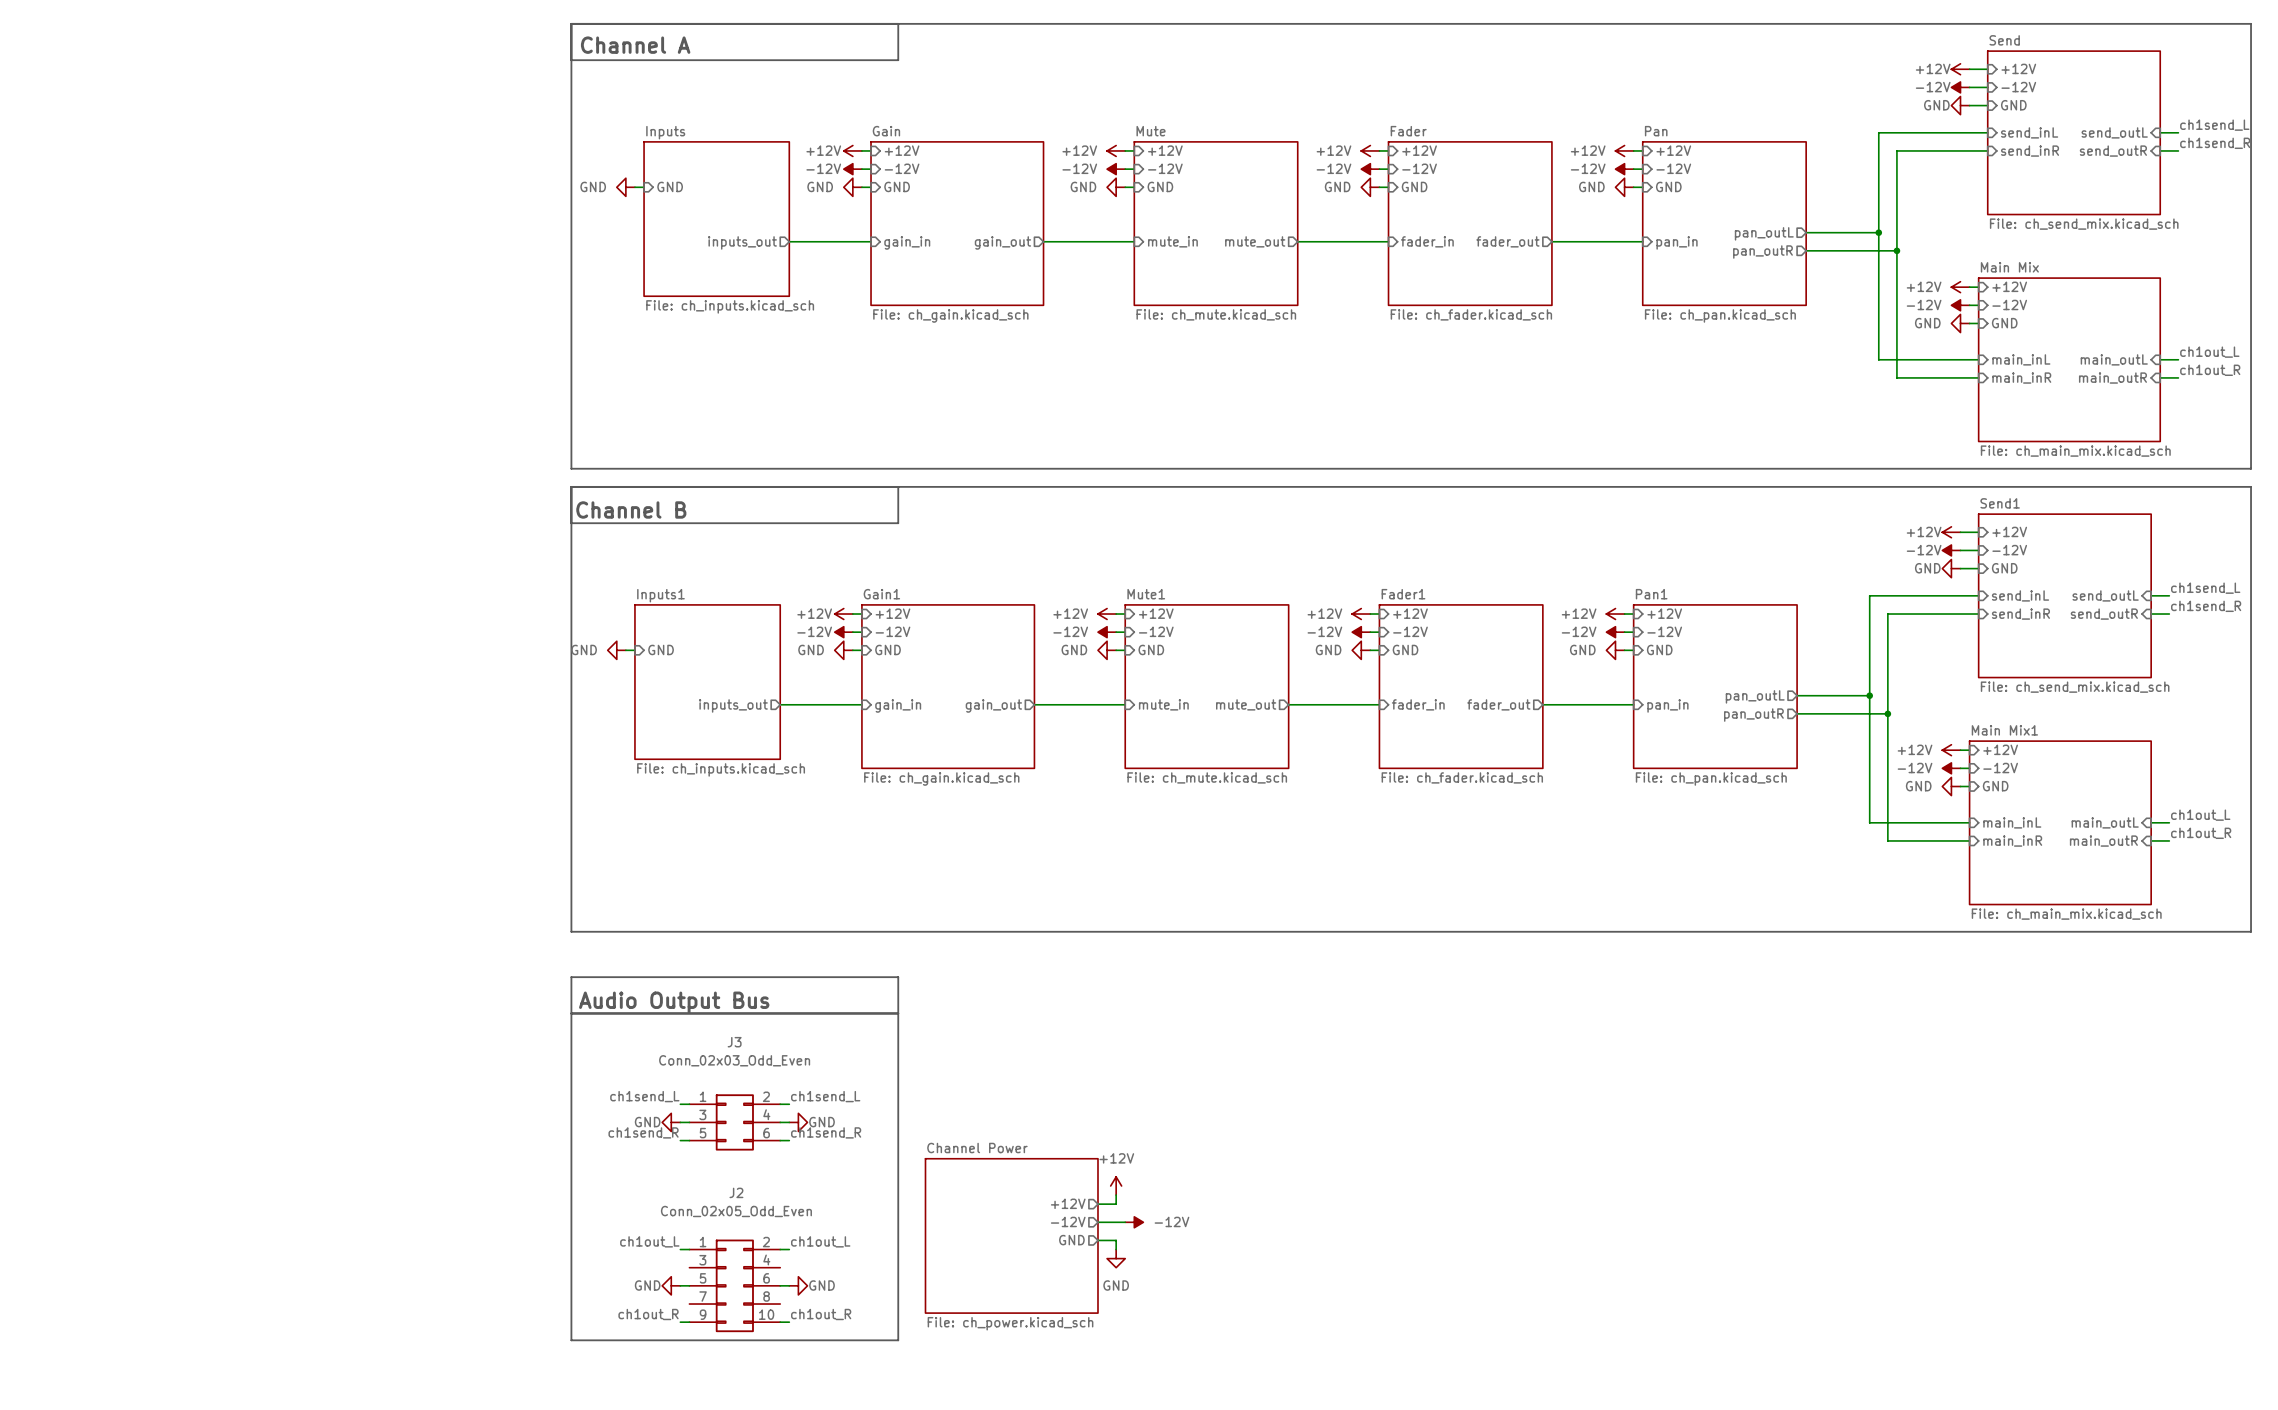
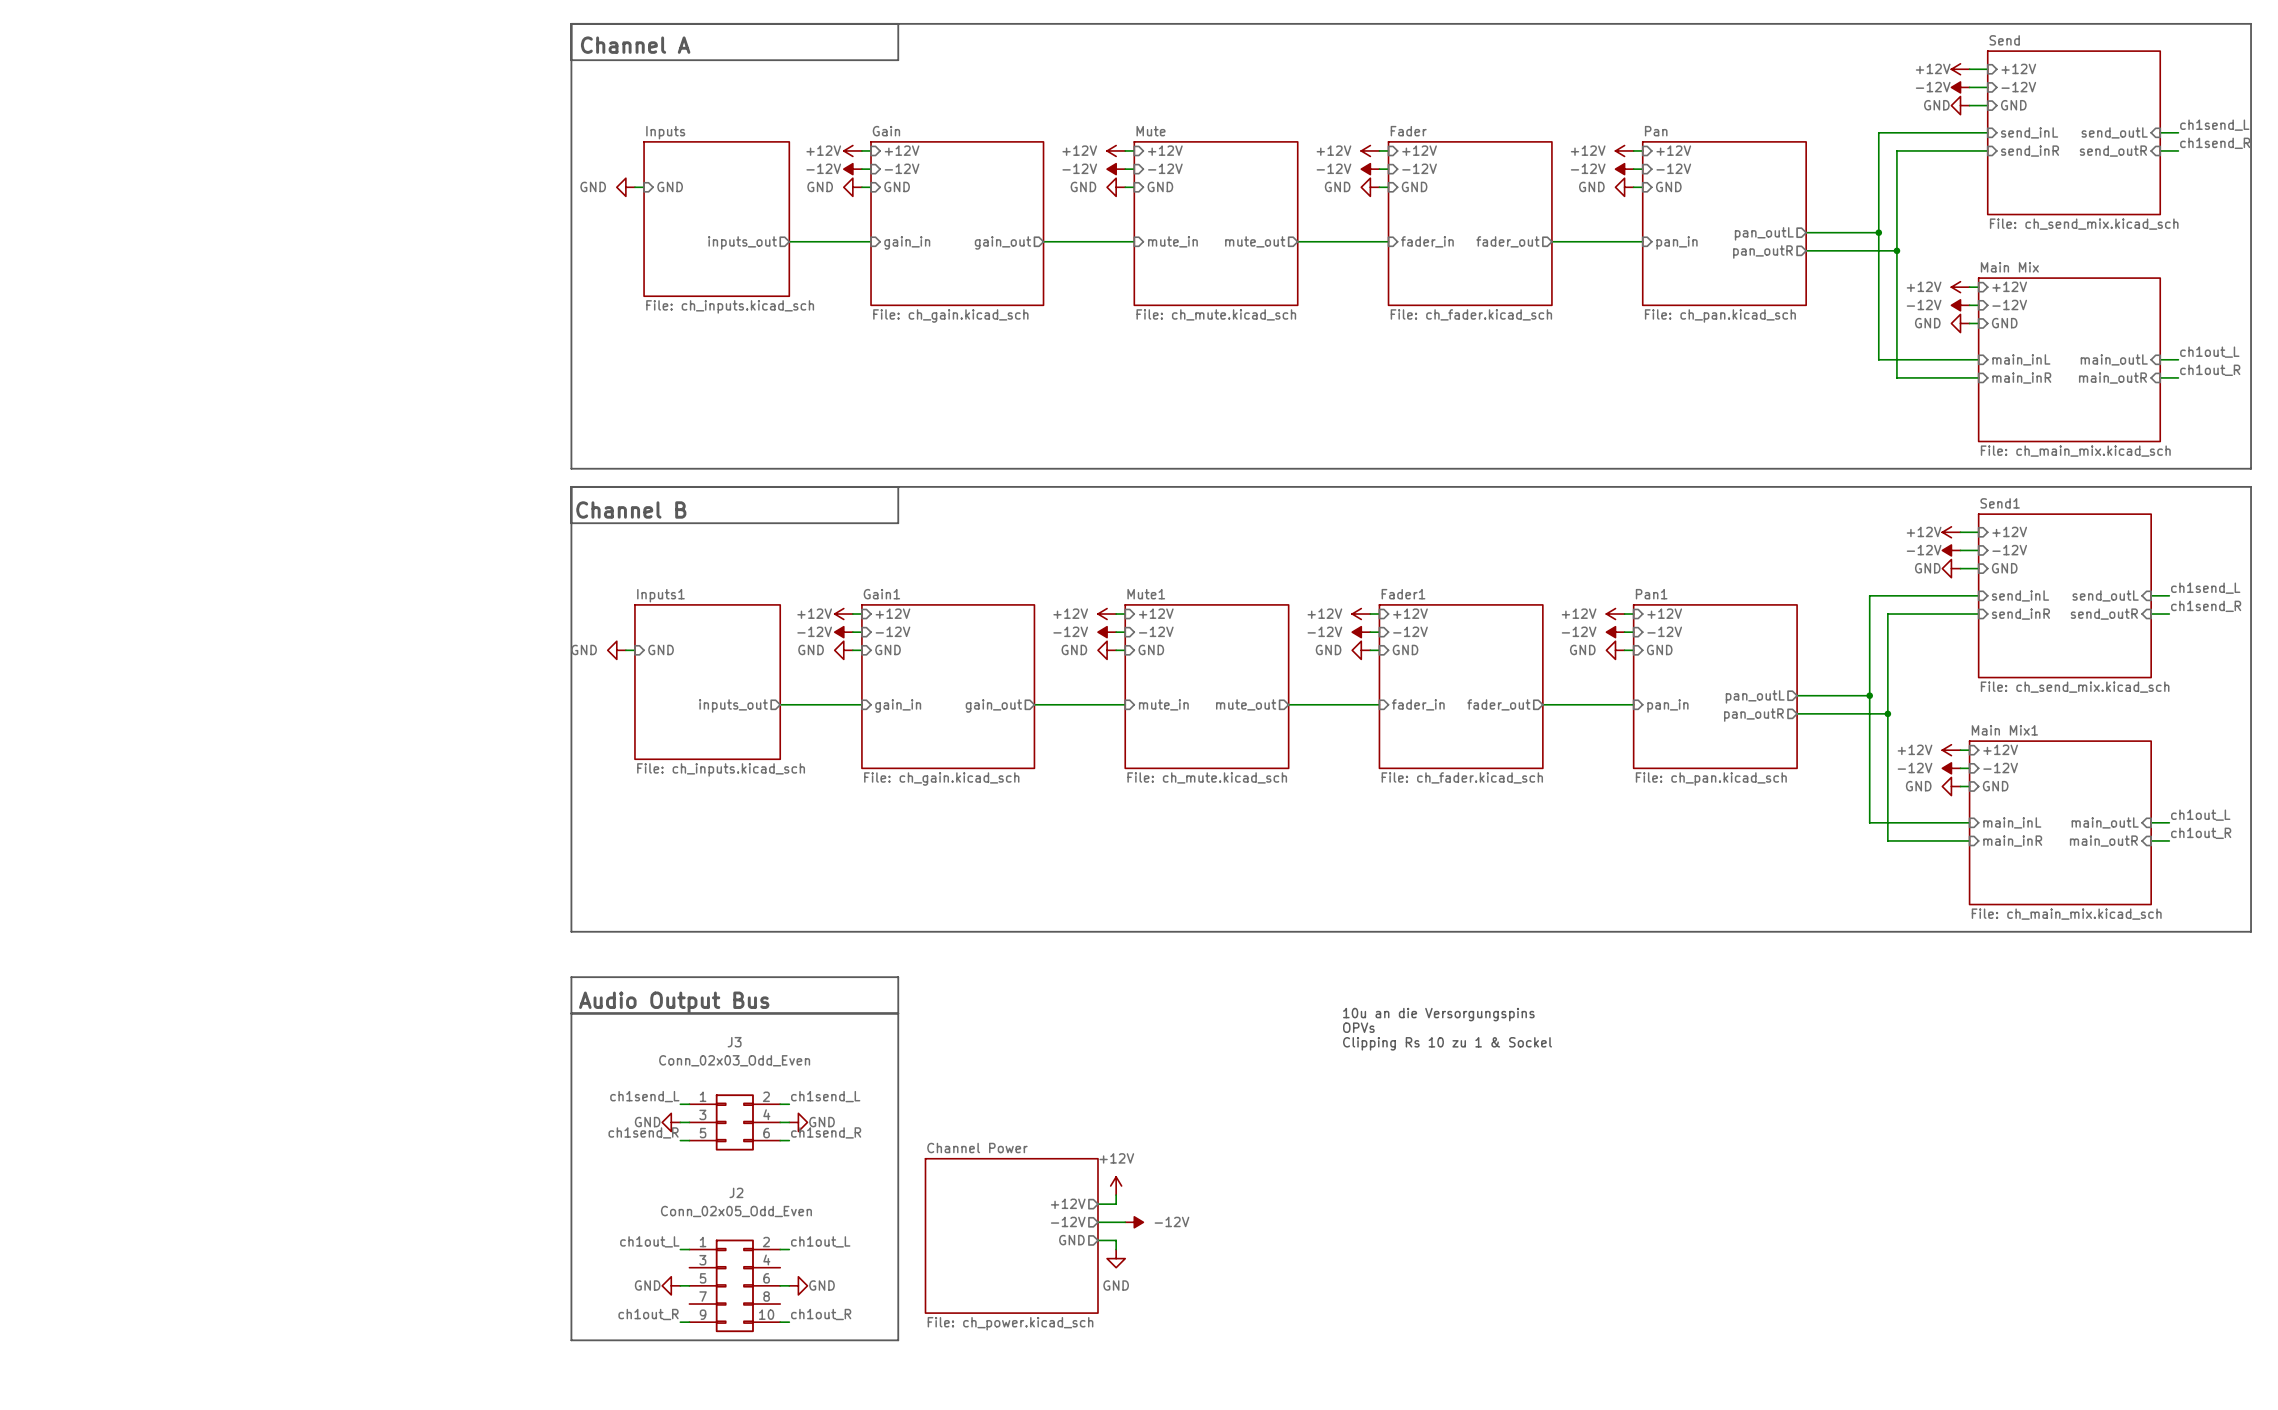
text: none -> 10u an die Versorgungspins (1438, 1014)
text: none -> OPVs (1358, 1027)
text: none -> Clipping Rs 10 zu 1 & Sockel (1447, 1043)

